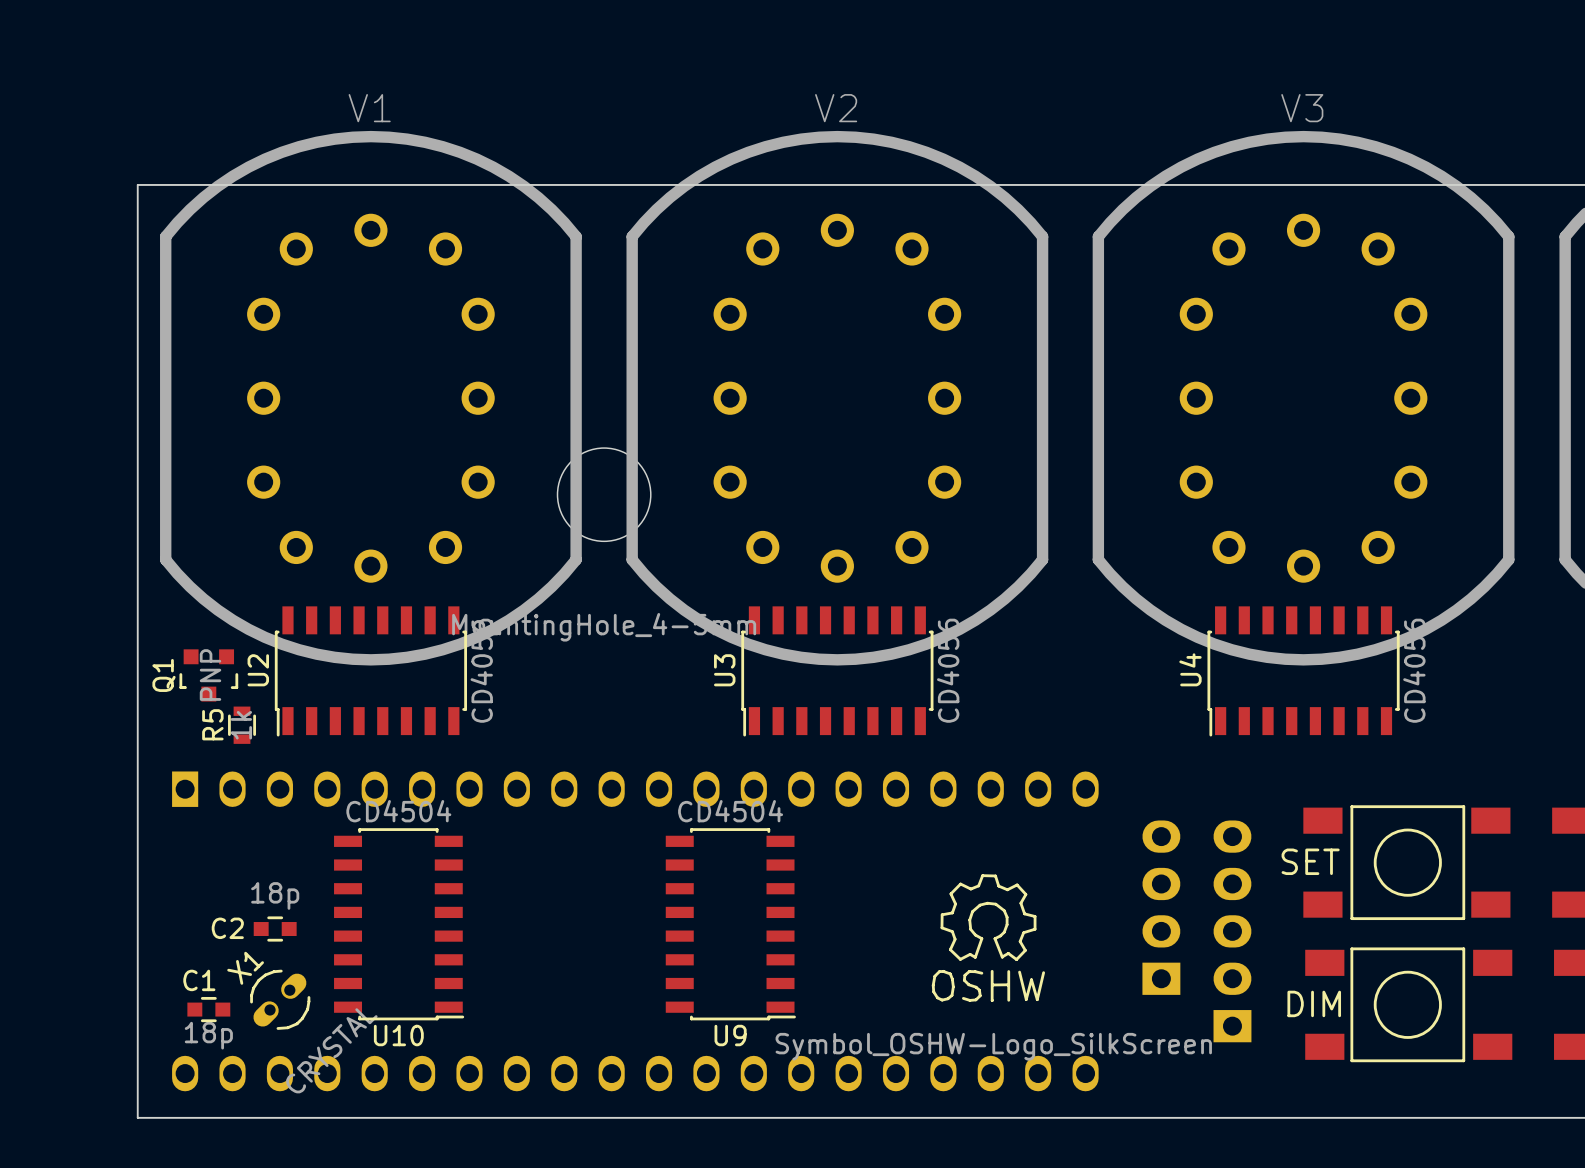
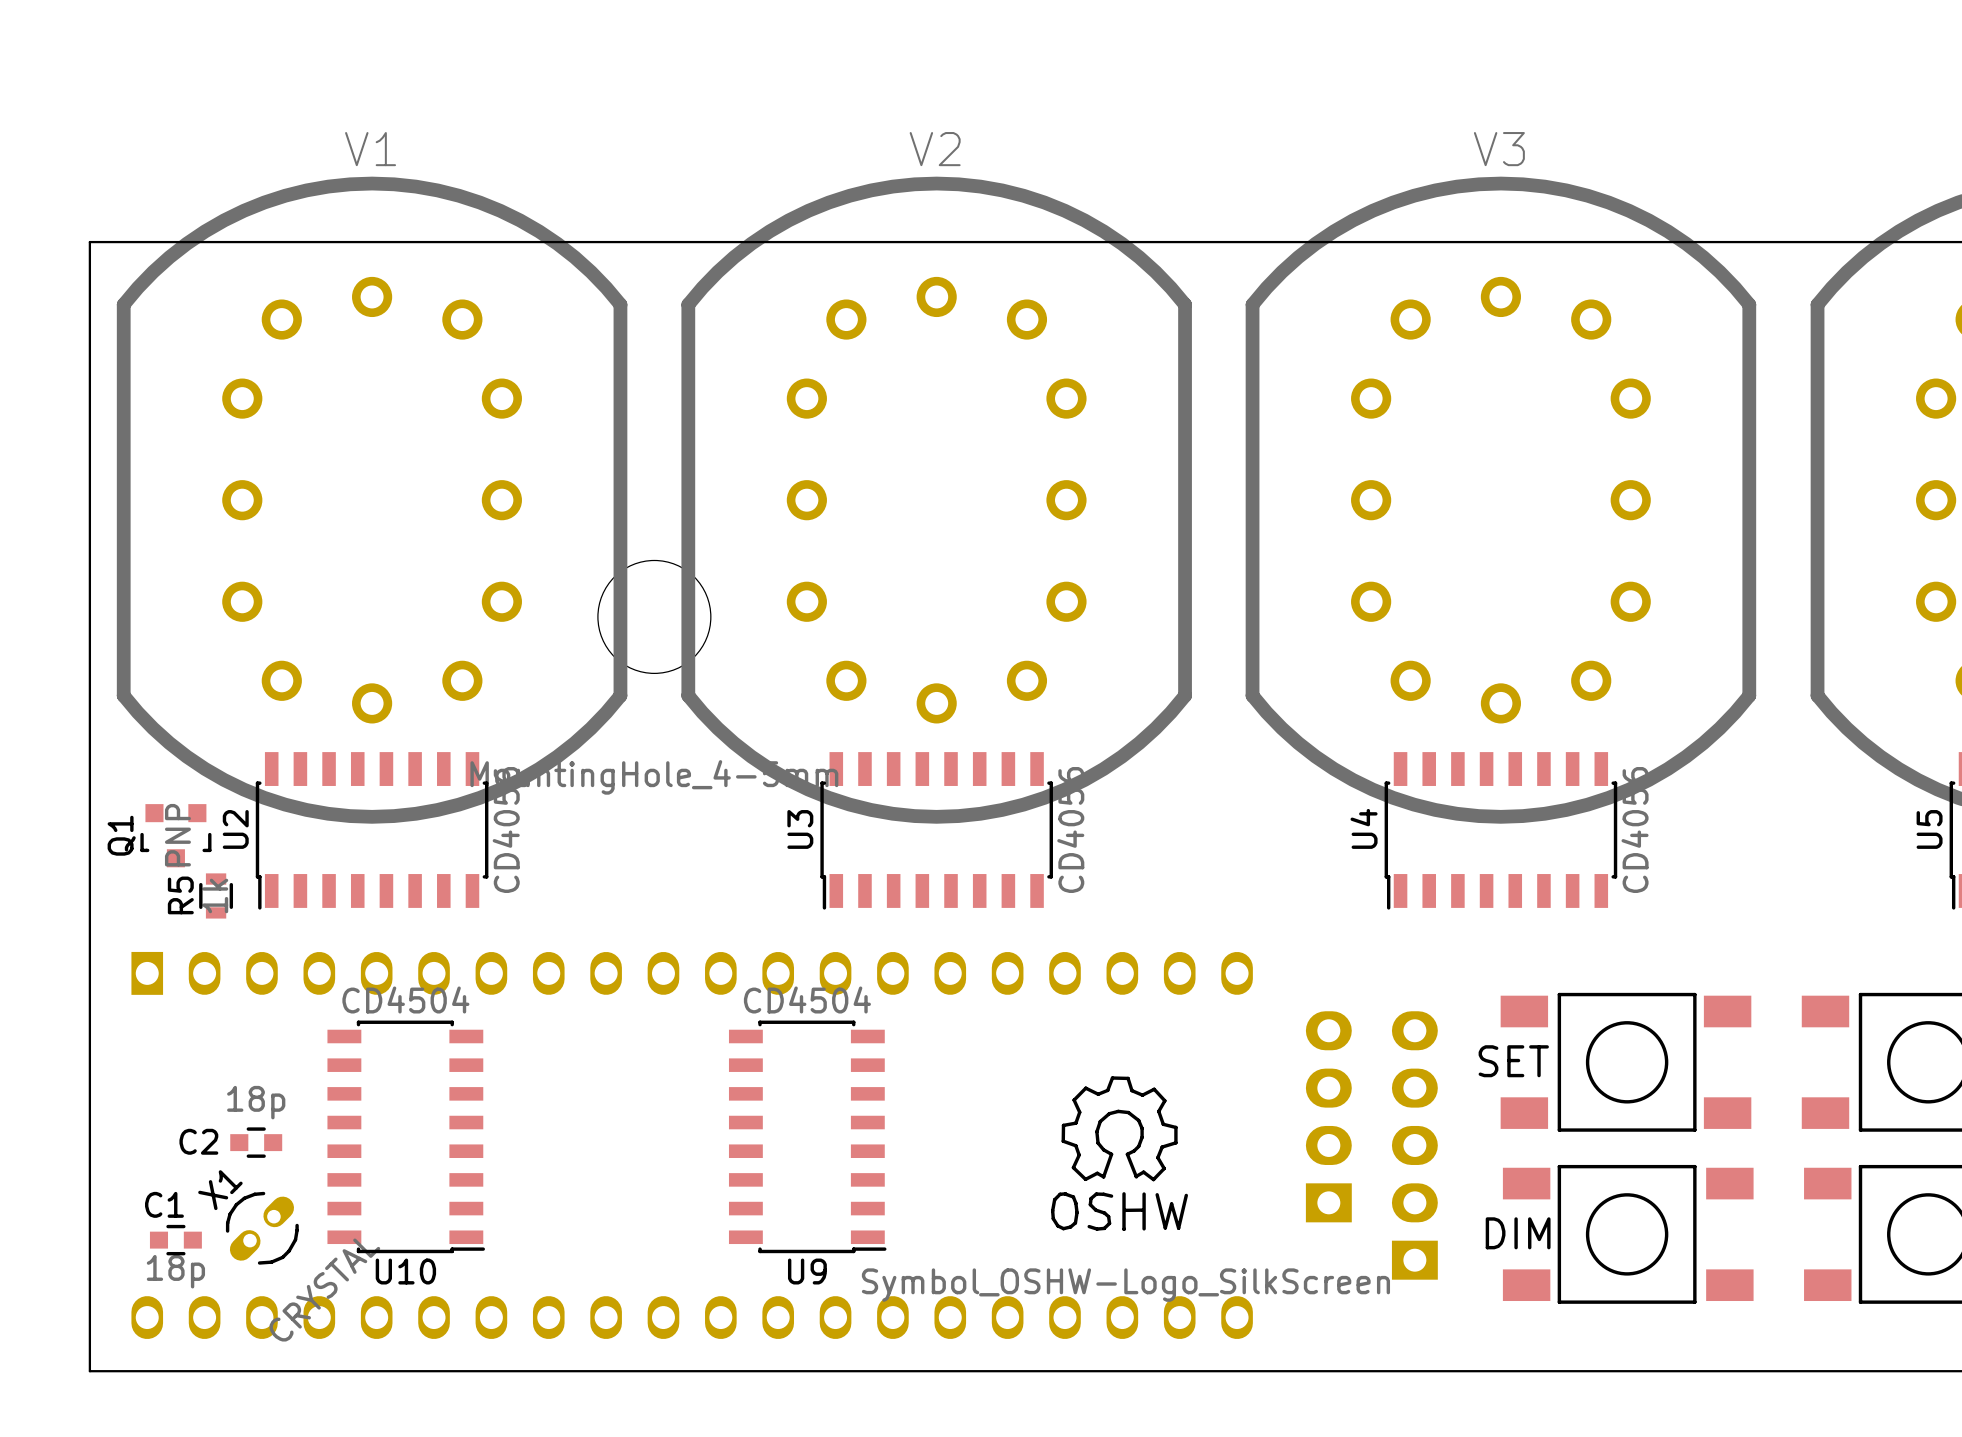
text: SET (1310, 861) -> none
part value: none -> SET (1513, 1061)
text: DIM (1314, 1003) -> none
part value: none -> DIM (1518, 1233)

